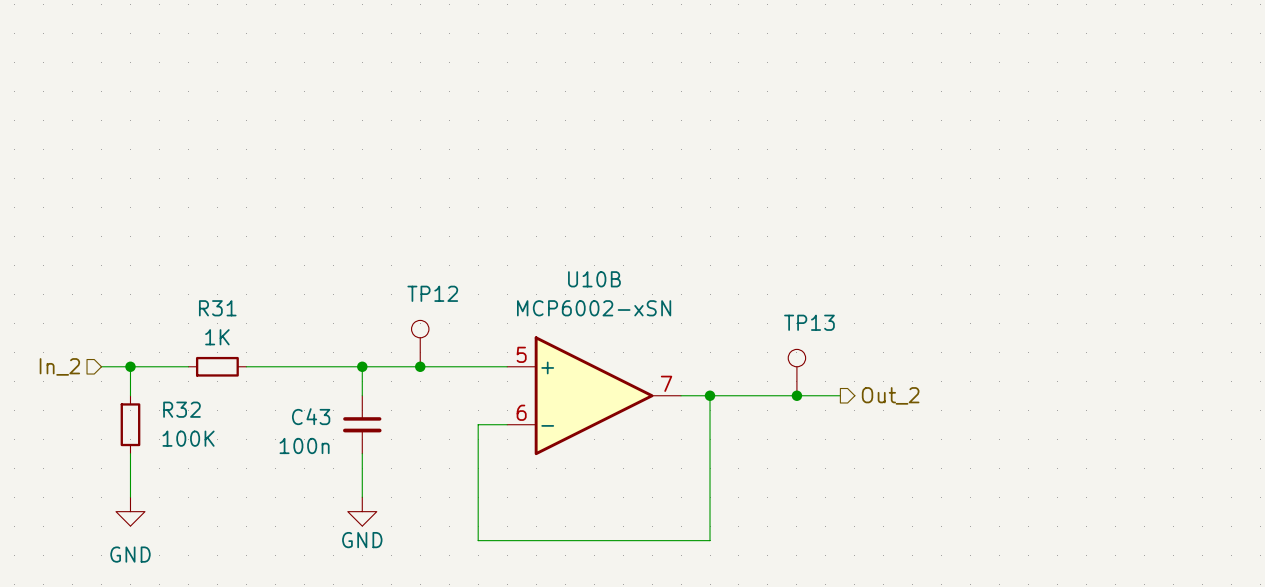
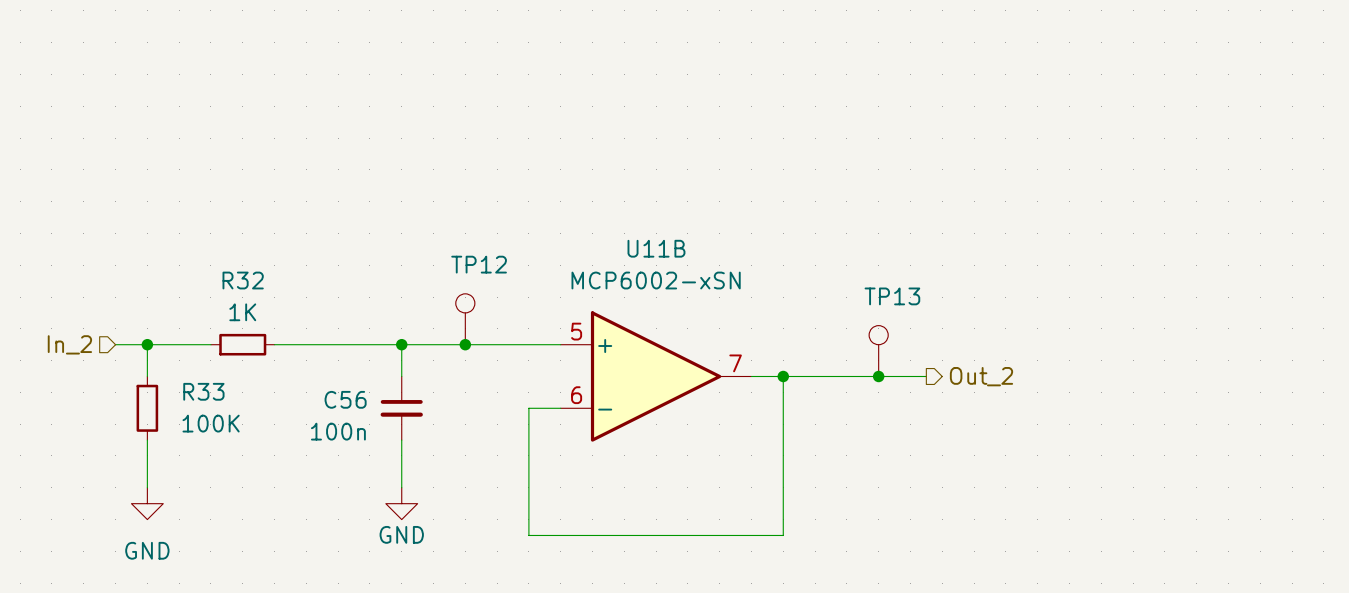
U10B name: U10B (594, 279) -> U11B (656, 248)
R31 name: R31 (217, 308) -> R32 (243, 280)
R32 name: R32 (181, 409) -> R33 (203, 391)
C43 name: C43 (311, 416) -> C56 (345, 399)

